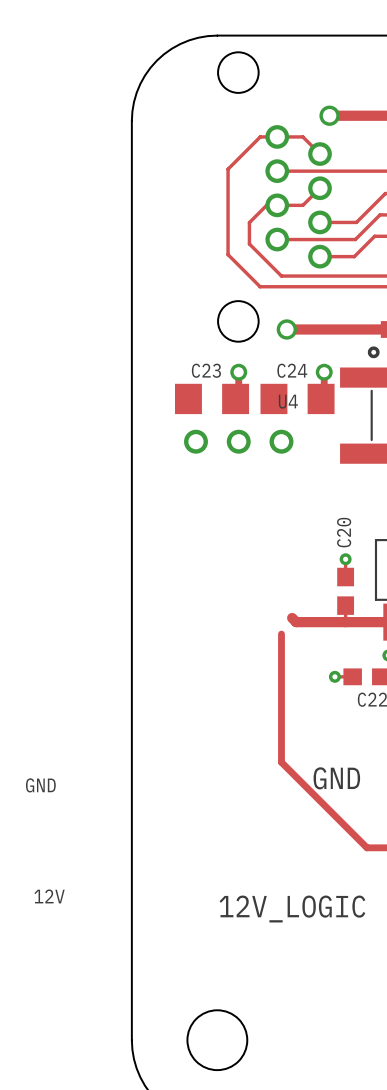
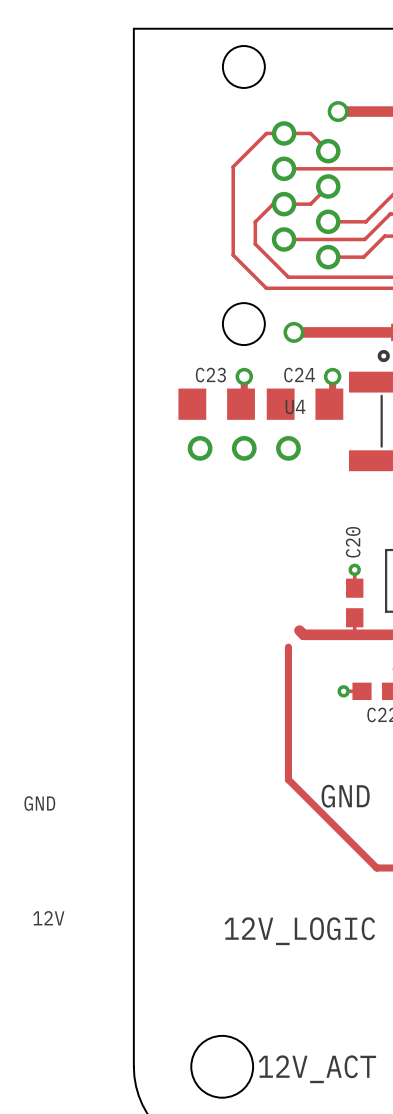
board edge: (217, 35) (198, 37) (180, 44) (156, 60) (140, 83) (134, 102) (131, 121) -> (222, 28) (133, 28) (133, 117)
text: none -> 12V_ACT (317, 1069)

